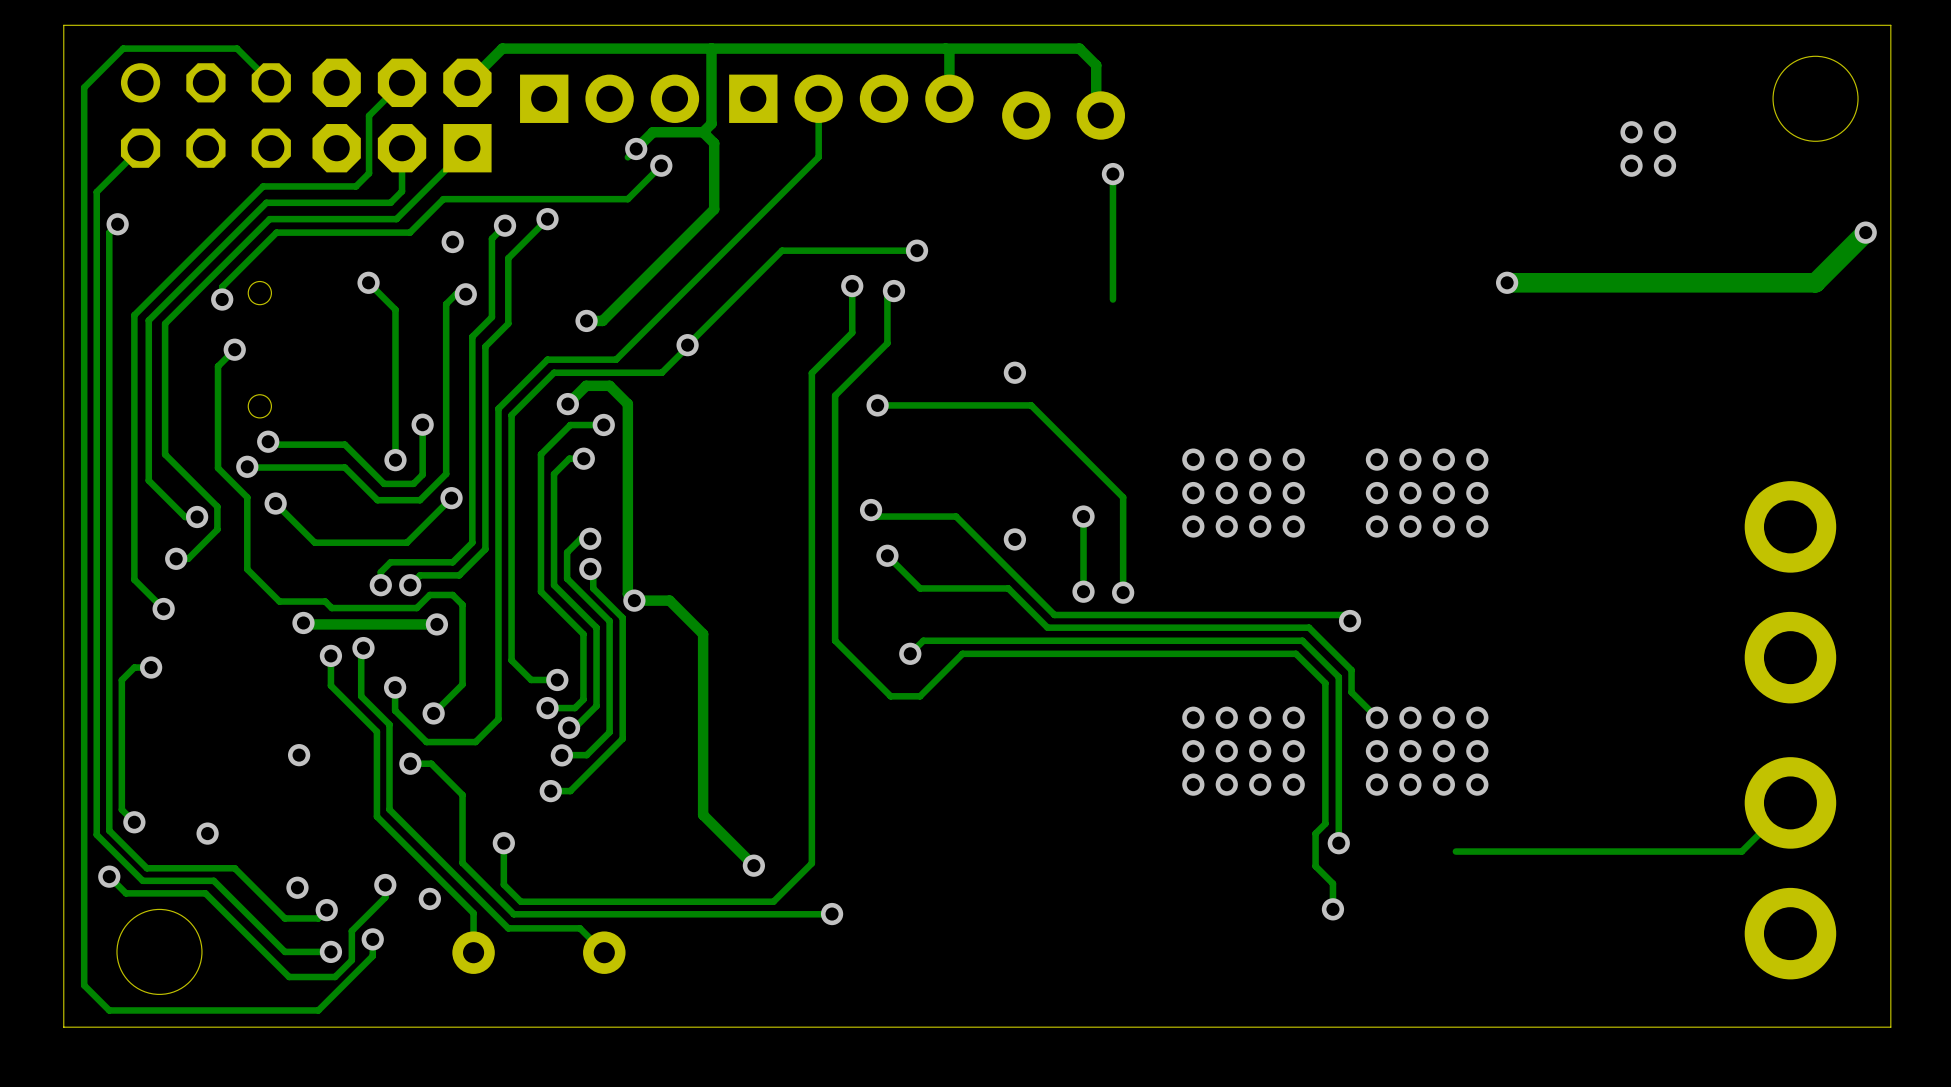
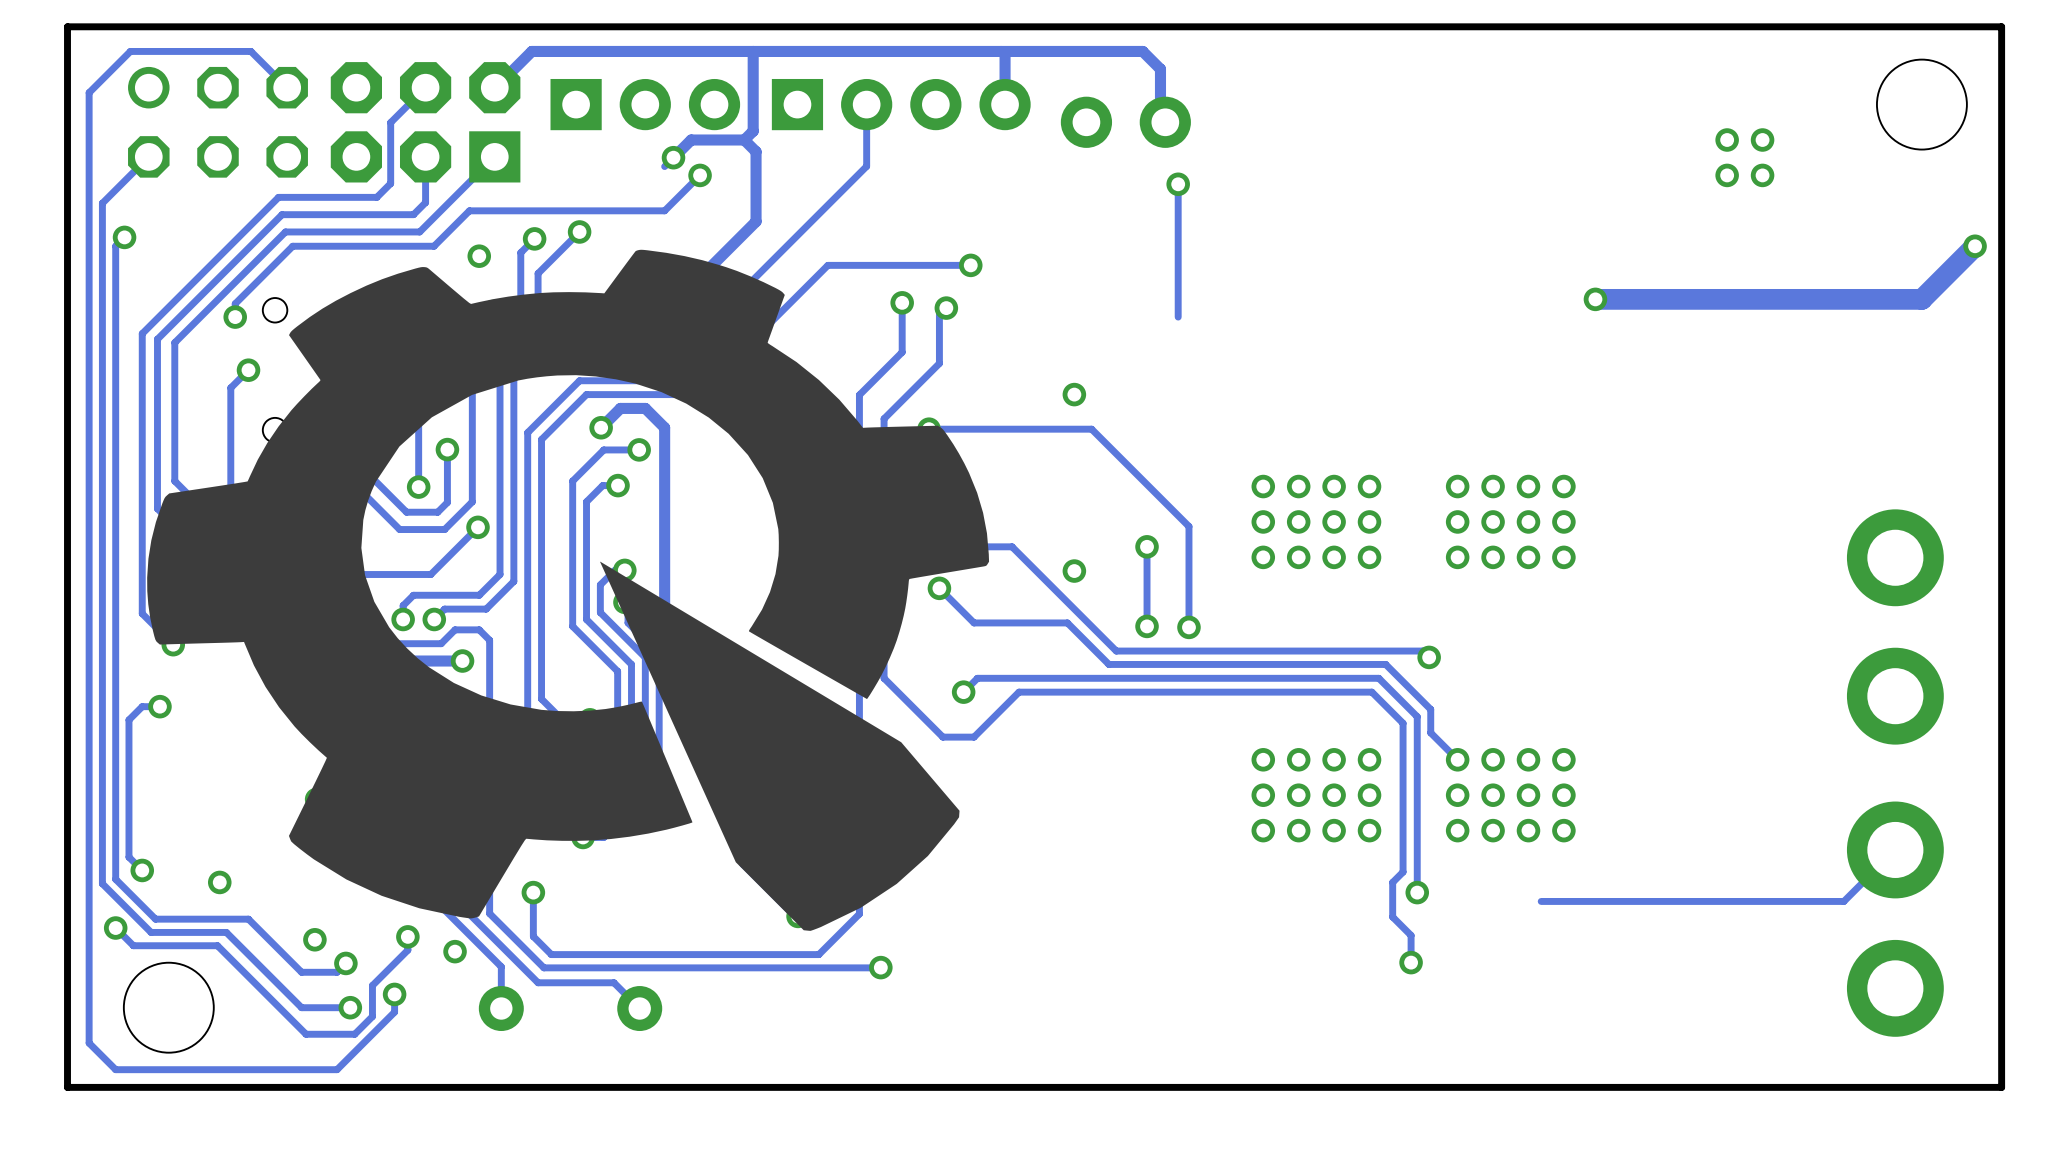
board edge width: thin (1890, 25) (63, 25) (63, 1027) (1890, 1027) (1890, 25) -> thick (2001, 26) (67, 26) (67, 1087) (2001, 1087) (2001, 26)
drawing: none -> [147, 249, 990, 931]

